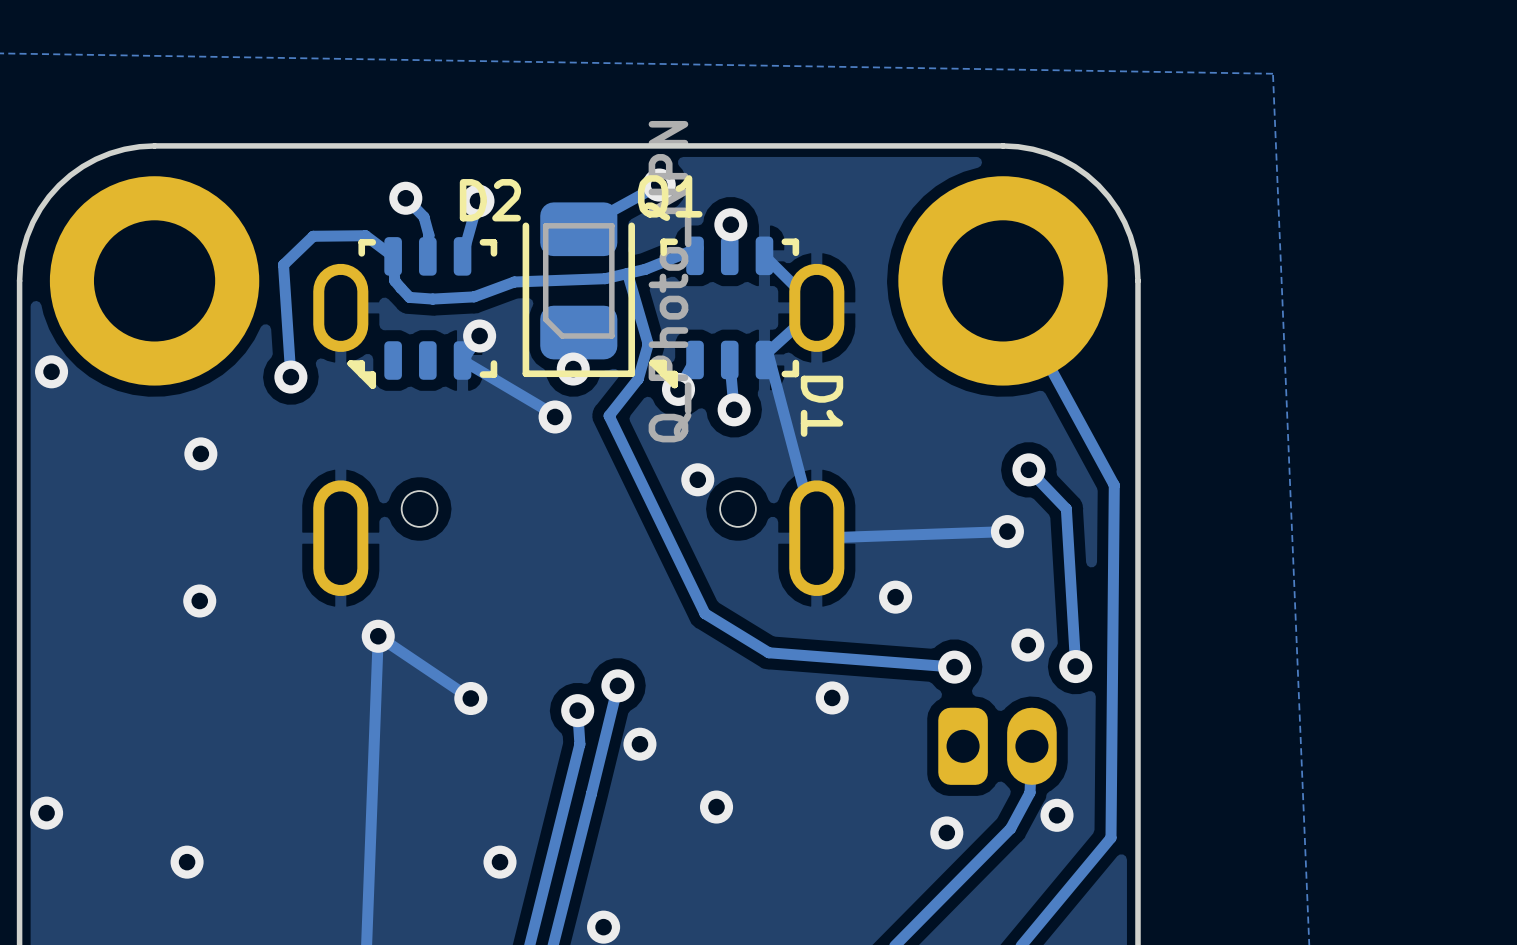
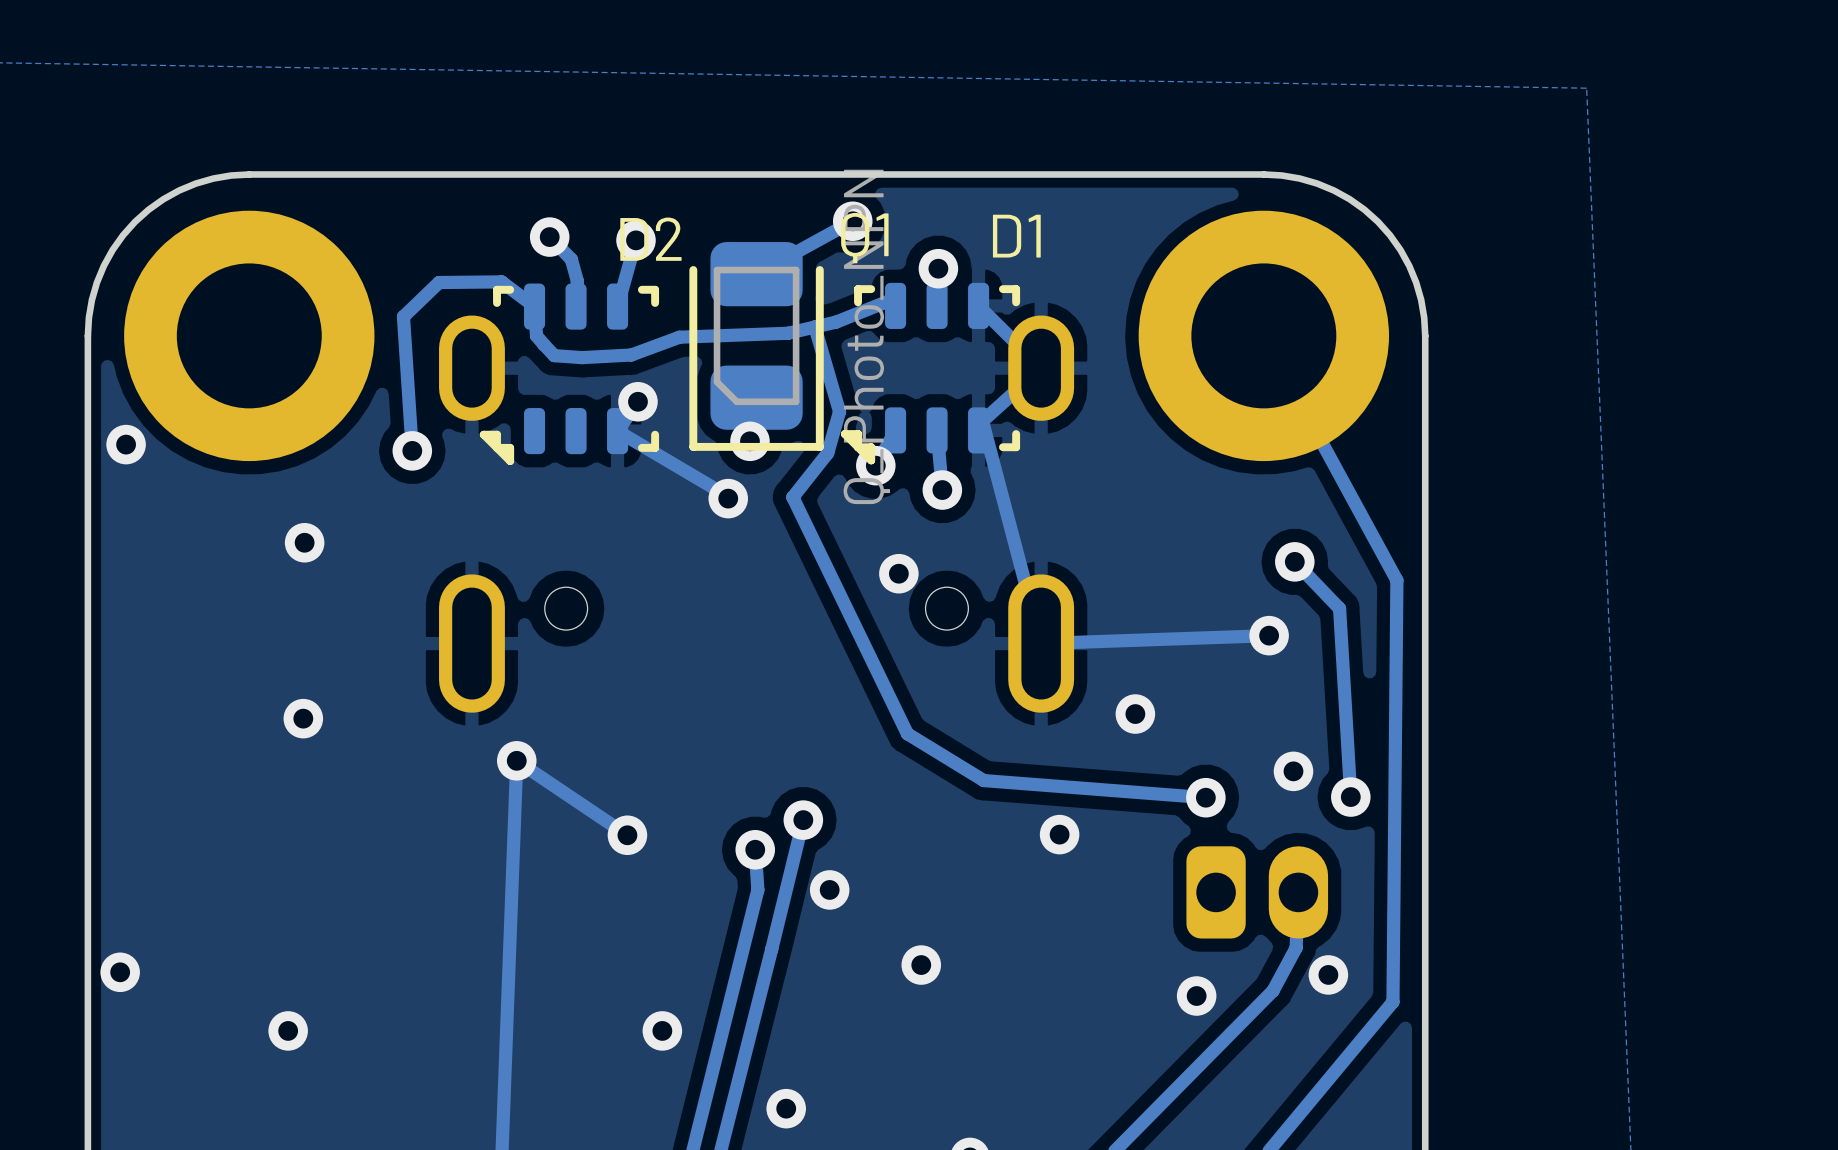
D1 name rotation: 0° (821, 406) -> 90° counterclockwise (1016, 236)
D1 name position: D1 (821, 406) -> D1 (1016, 236)

